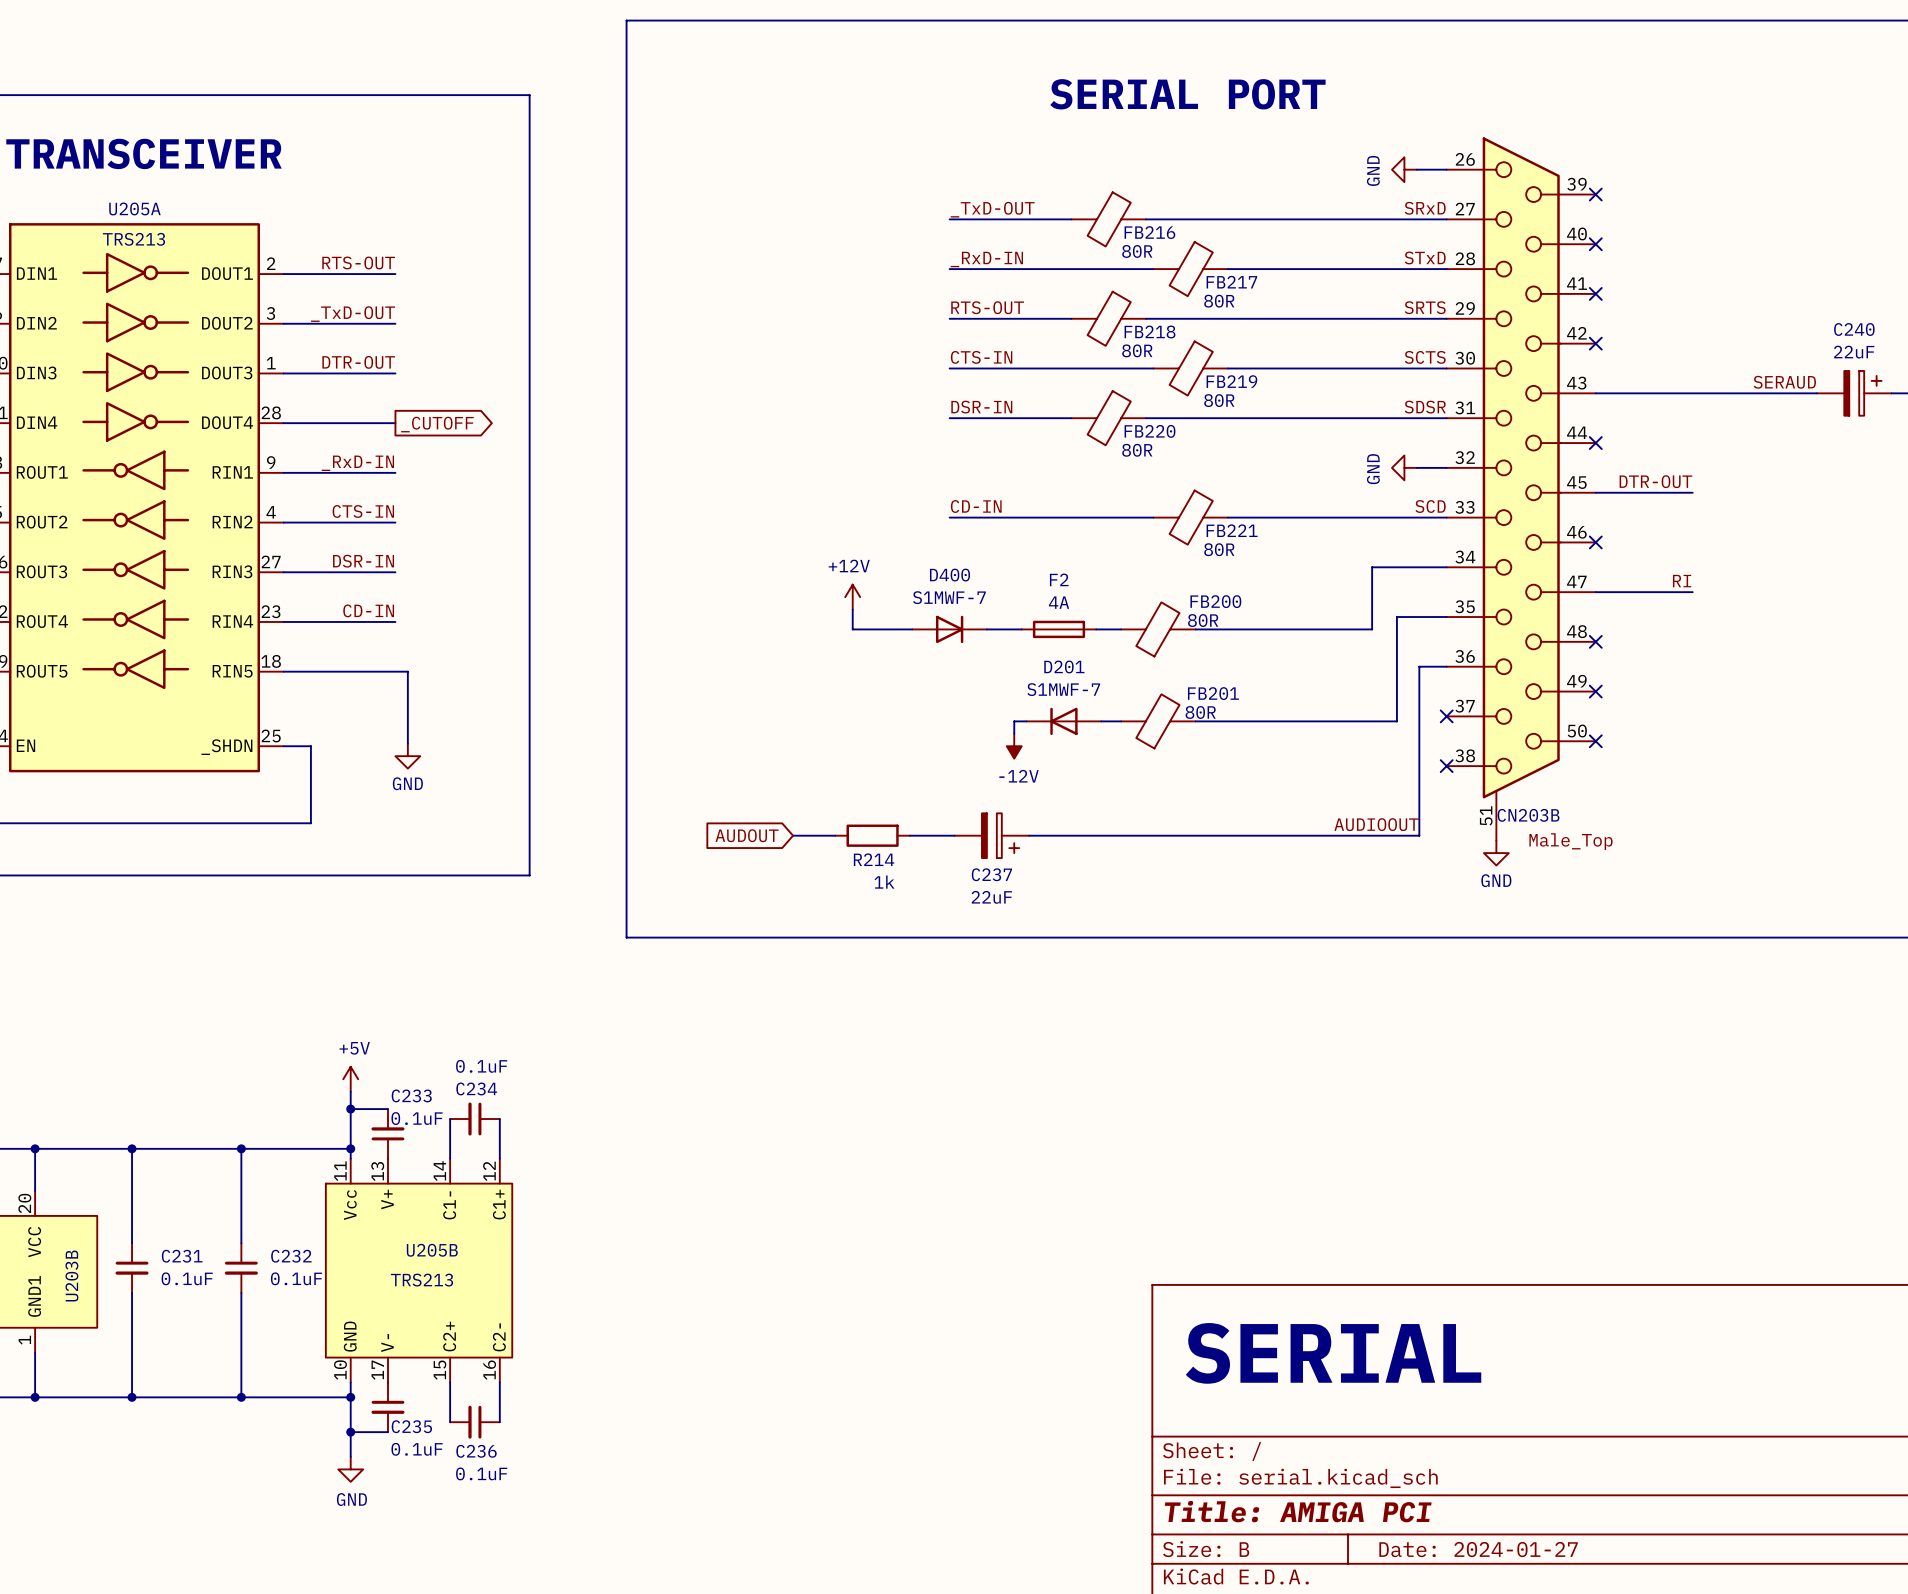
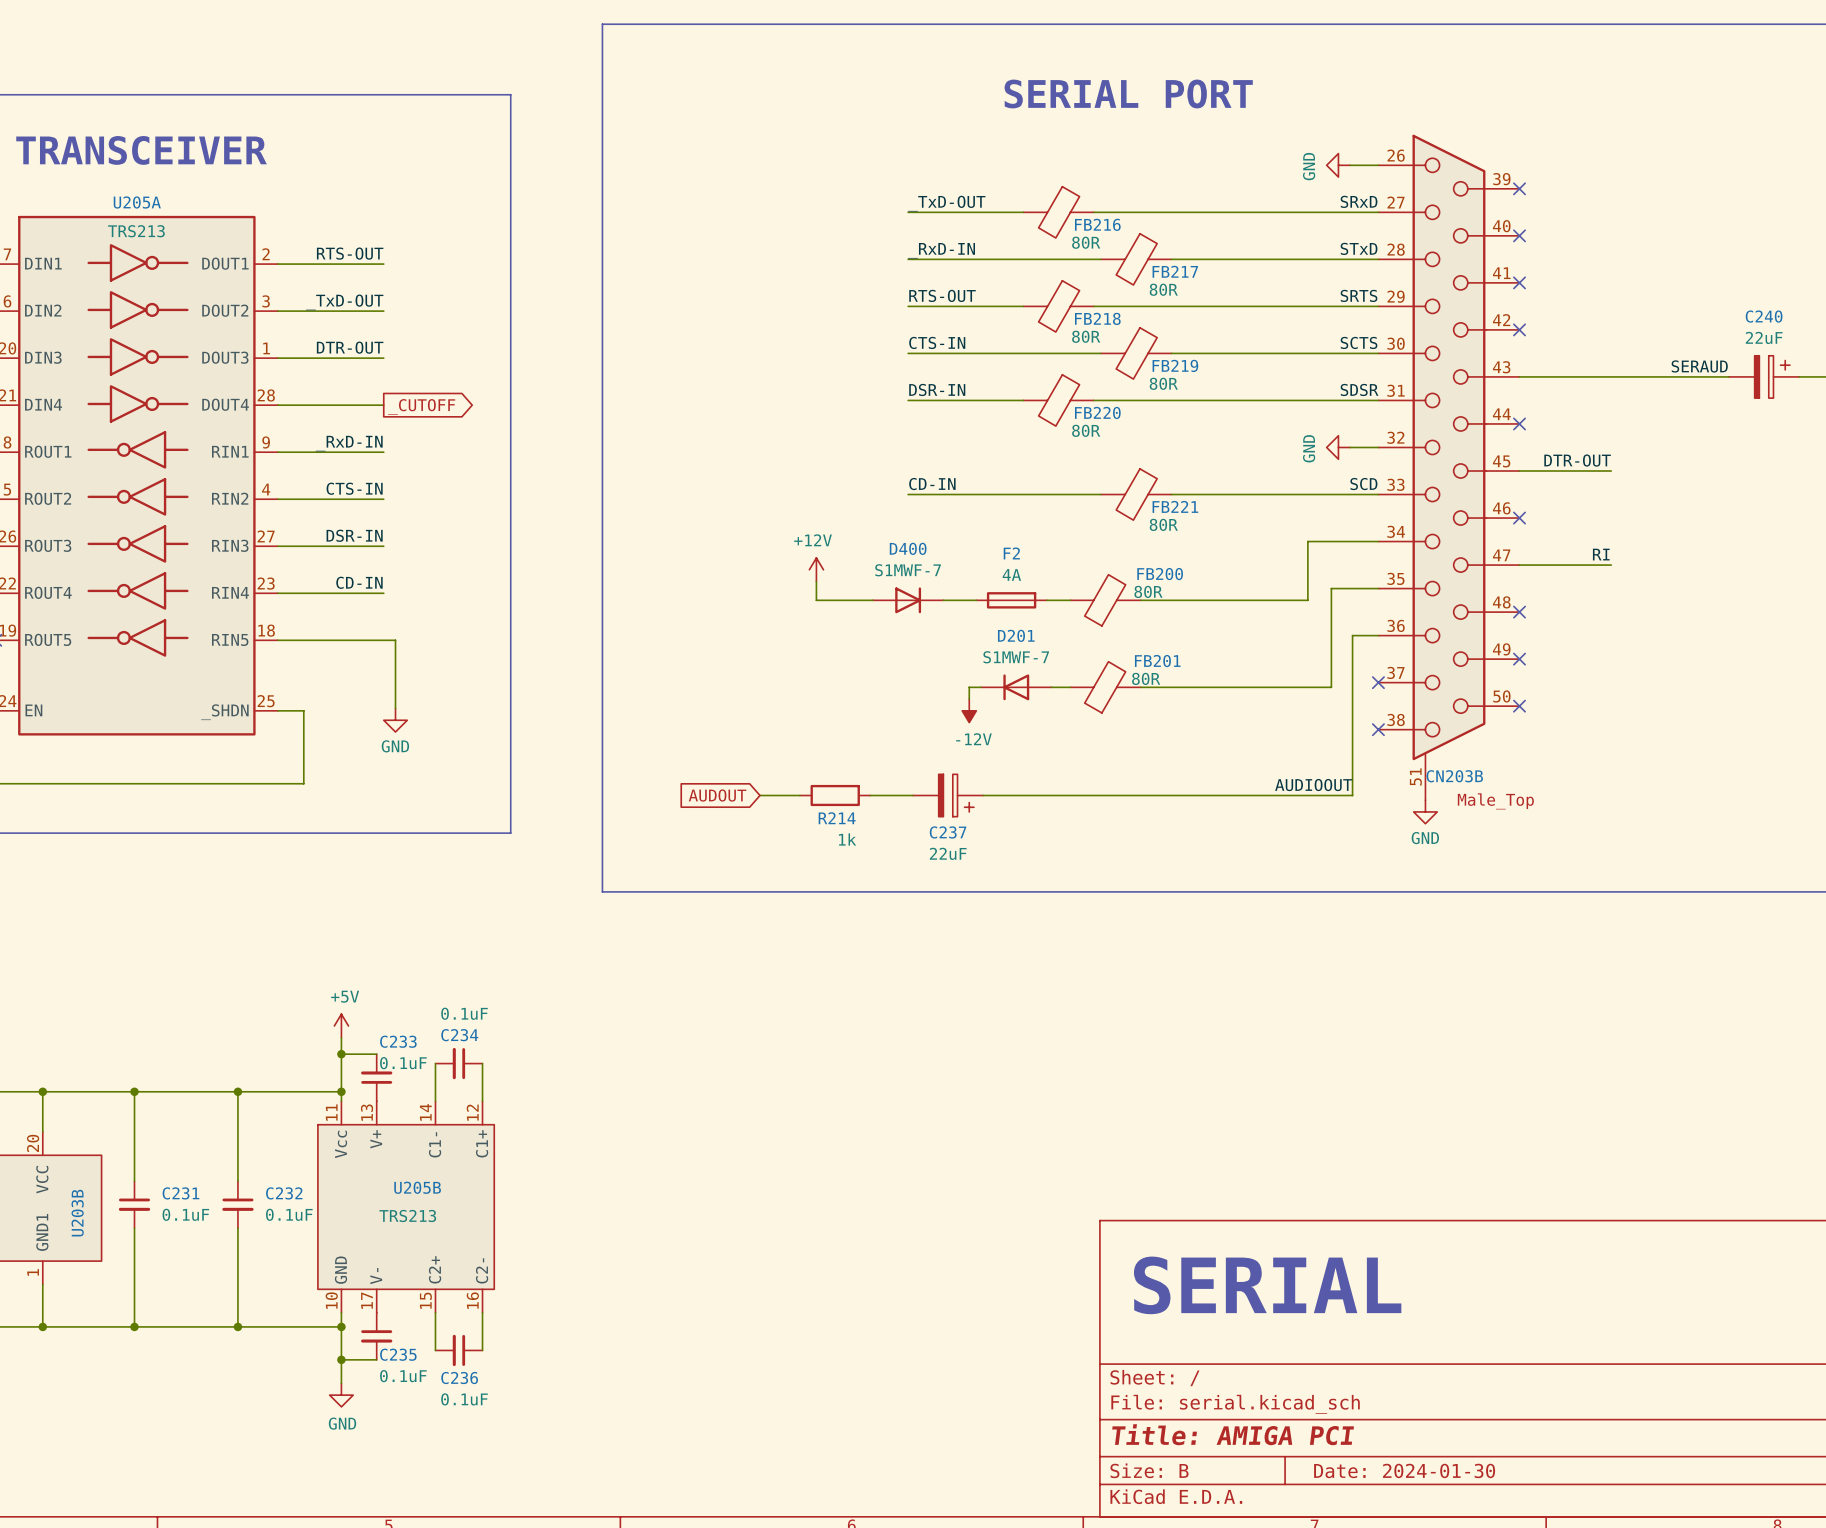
title block: Date: 2024-01-27 (1478, 1549) -> Date: 2024-01-30 (1404, 1470)

